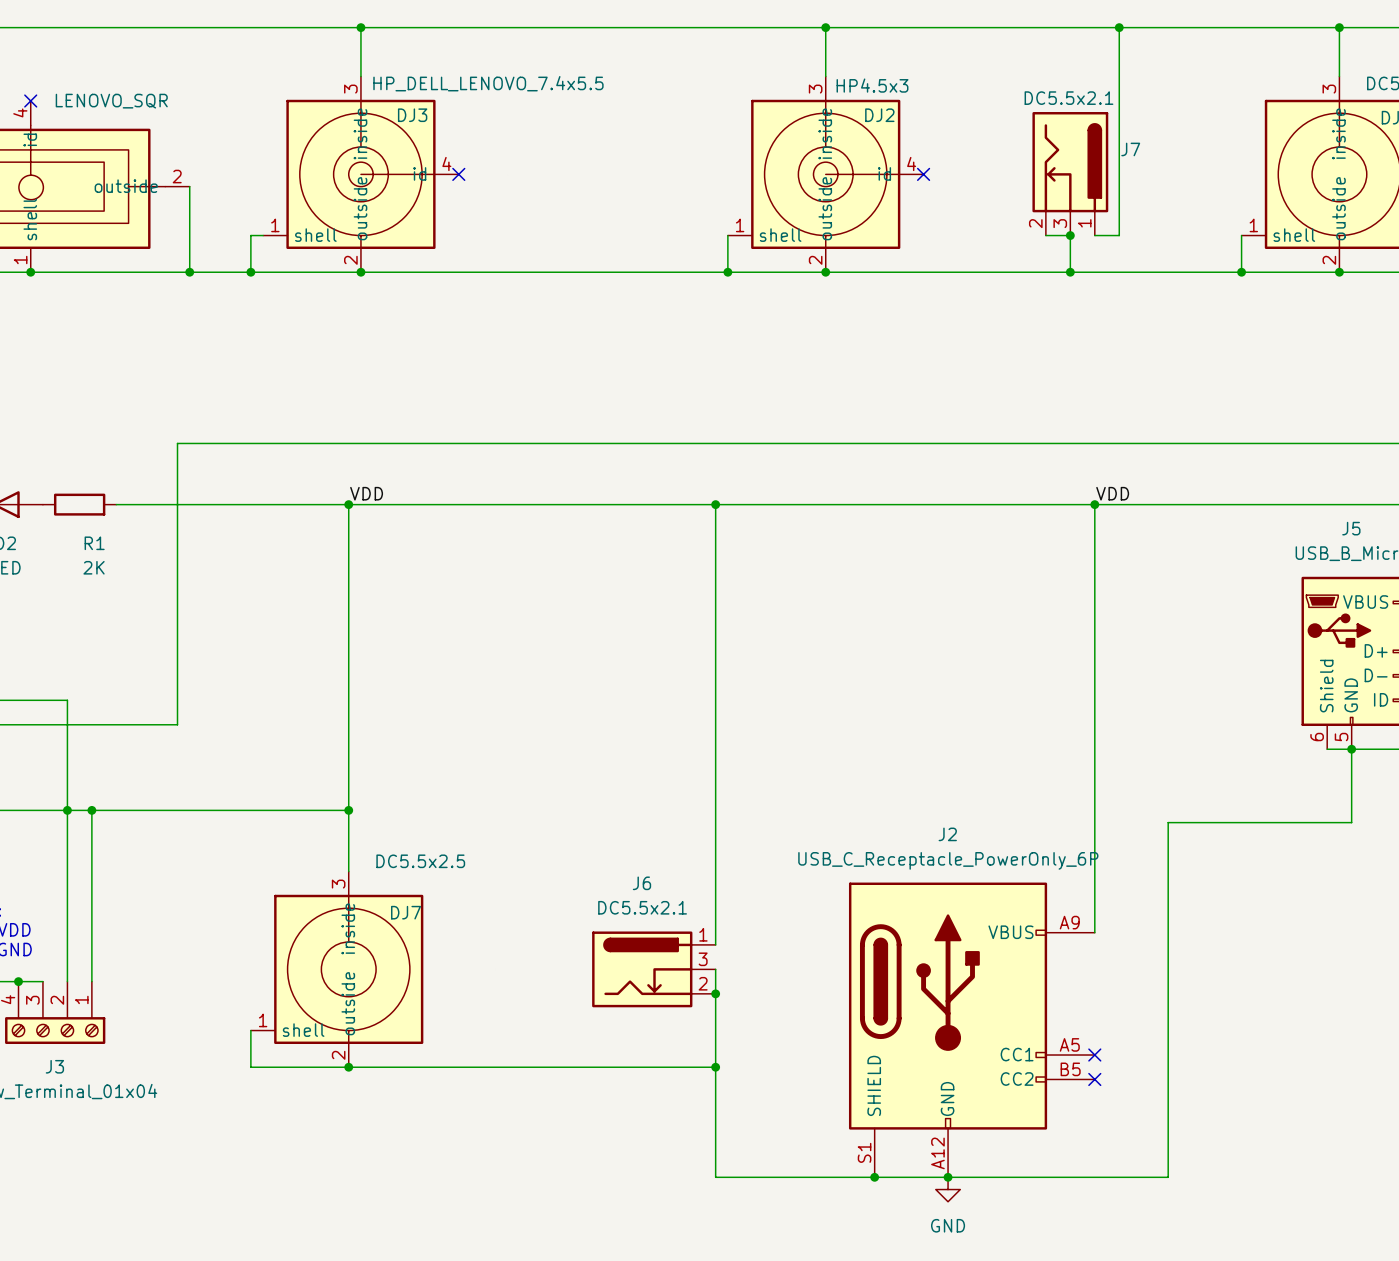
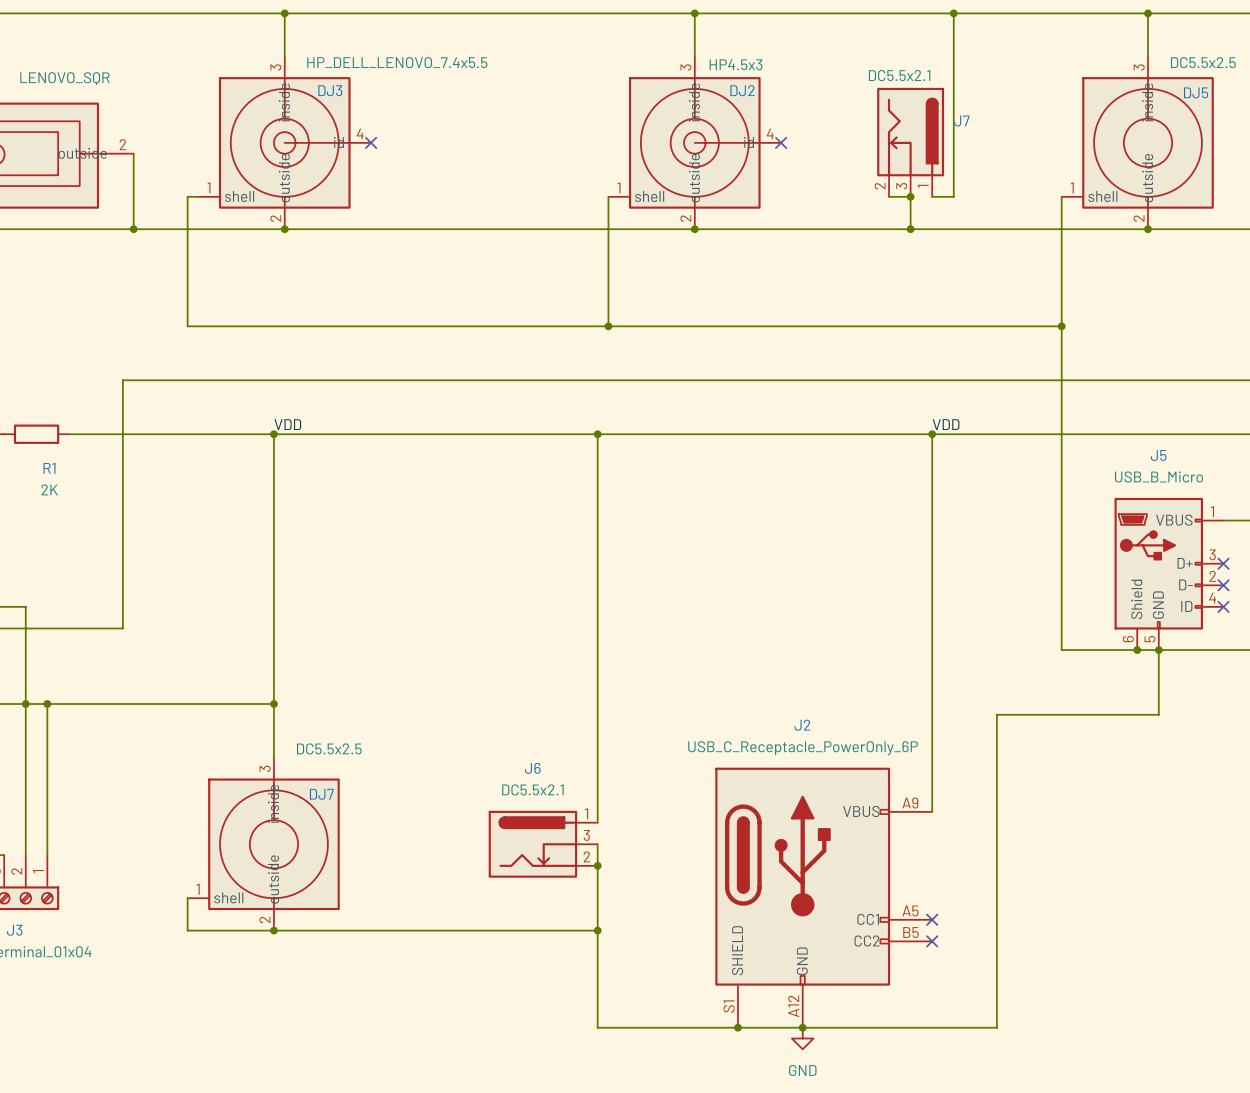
wire: none -> (187, 229) (187, 326) (1061, 326)
junction: (250, 272) -> none
wire: none -> (608, 229) (608, 326)
junction: (727, 272) -> none
wire: none -> (1061, 229) (1061, 650) (1137, 650)
junction: (1241, 272) -> none
junction: none -> (608, 326)
junction: none -> (1061, 326)
junction: none -> (1137, 650)

